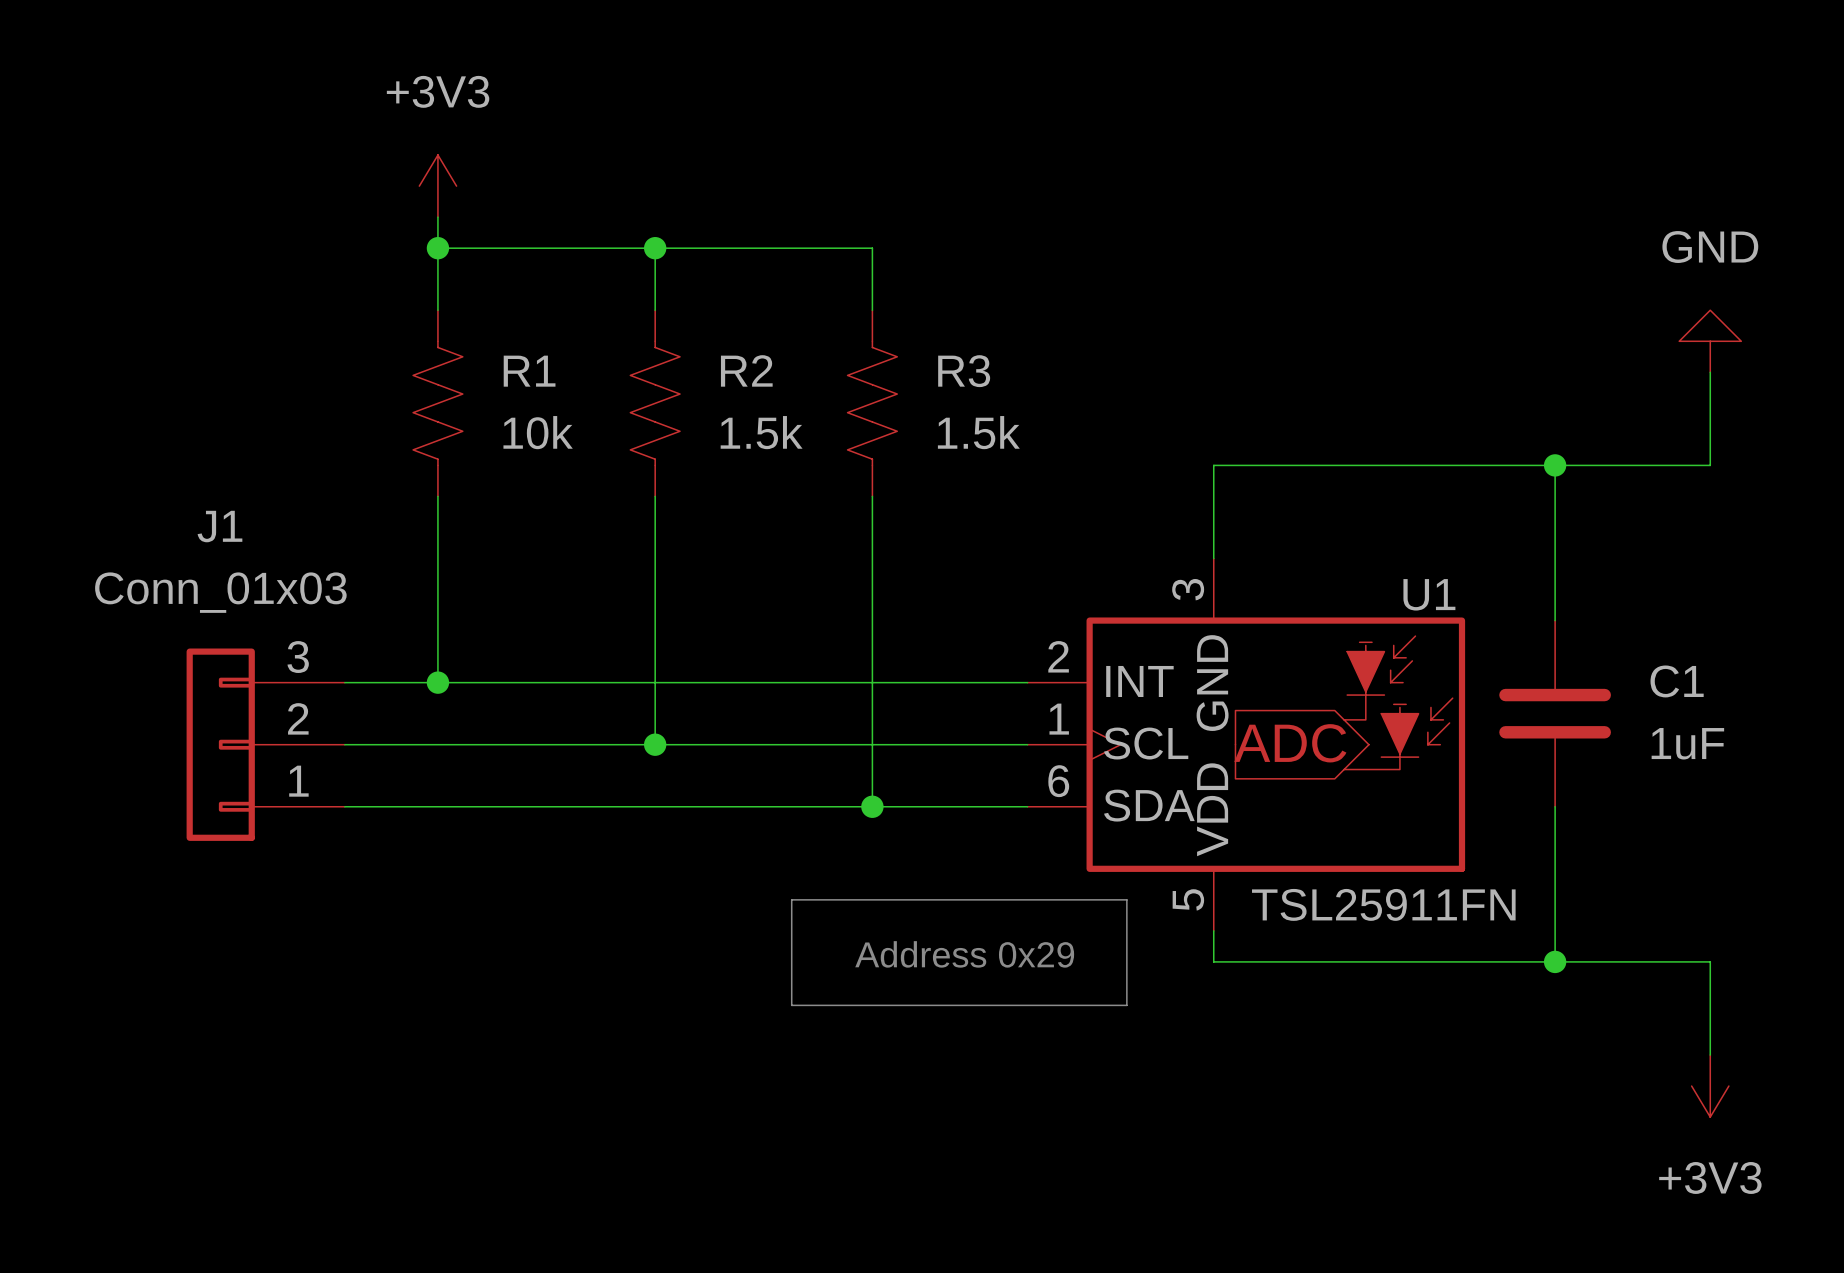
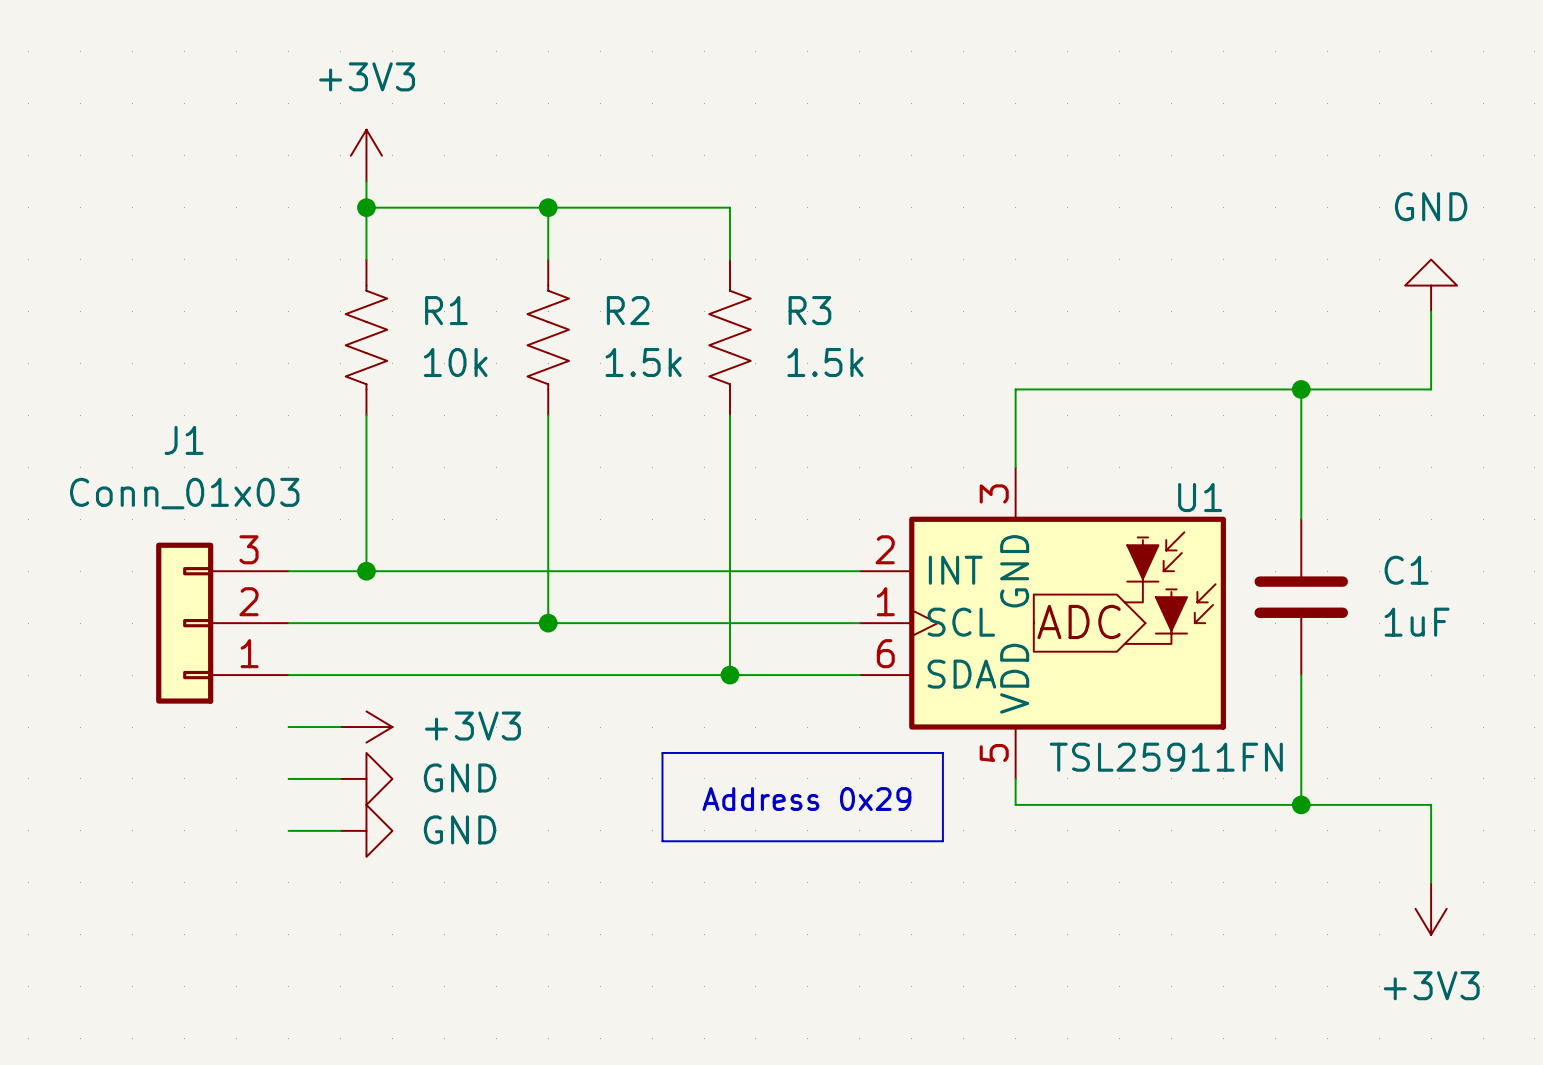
wire: none -> (288, 727) (340, 727)
power symbol: none -> +3V3 (366, 727)
wire: none -> (288, 778) (340, 778)
power symbol: none -> GND (366, 778)
wire: none -> (288, 830) (340, 830)
power symbol: none -> GND (366, 830)

